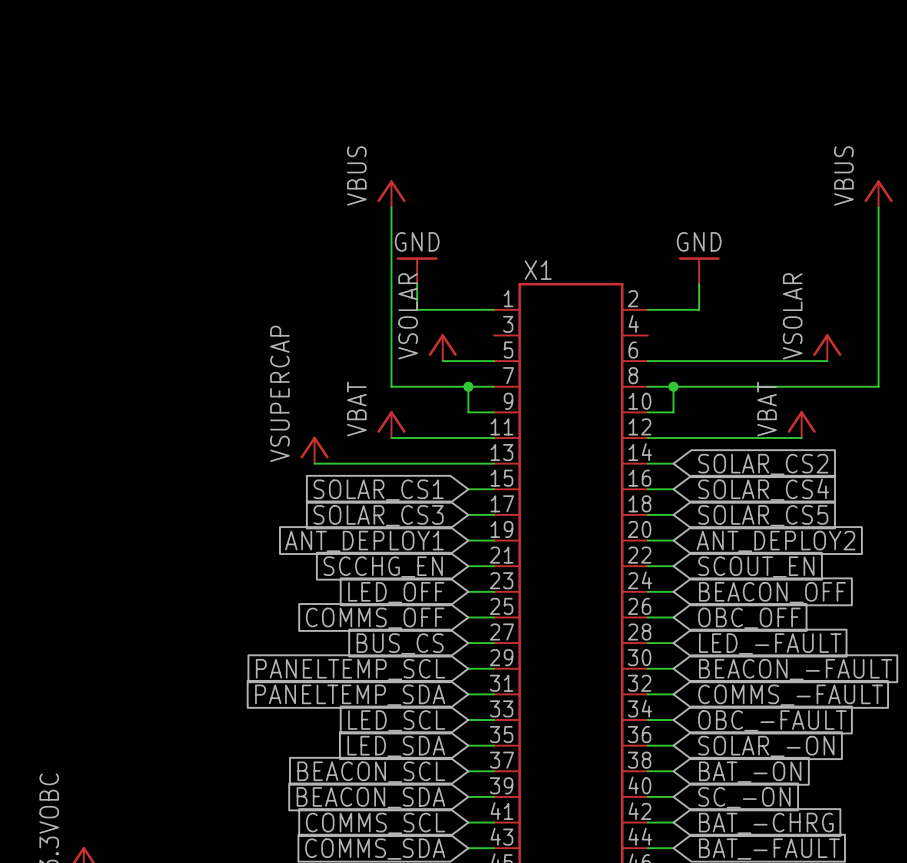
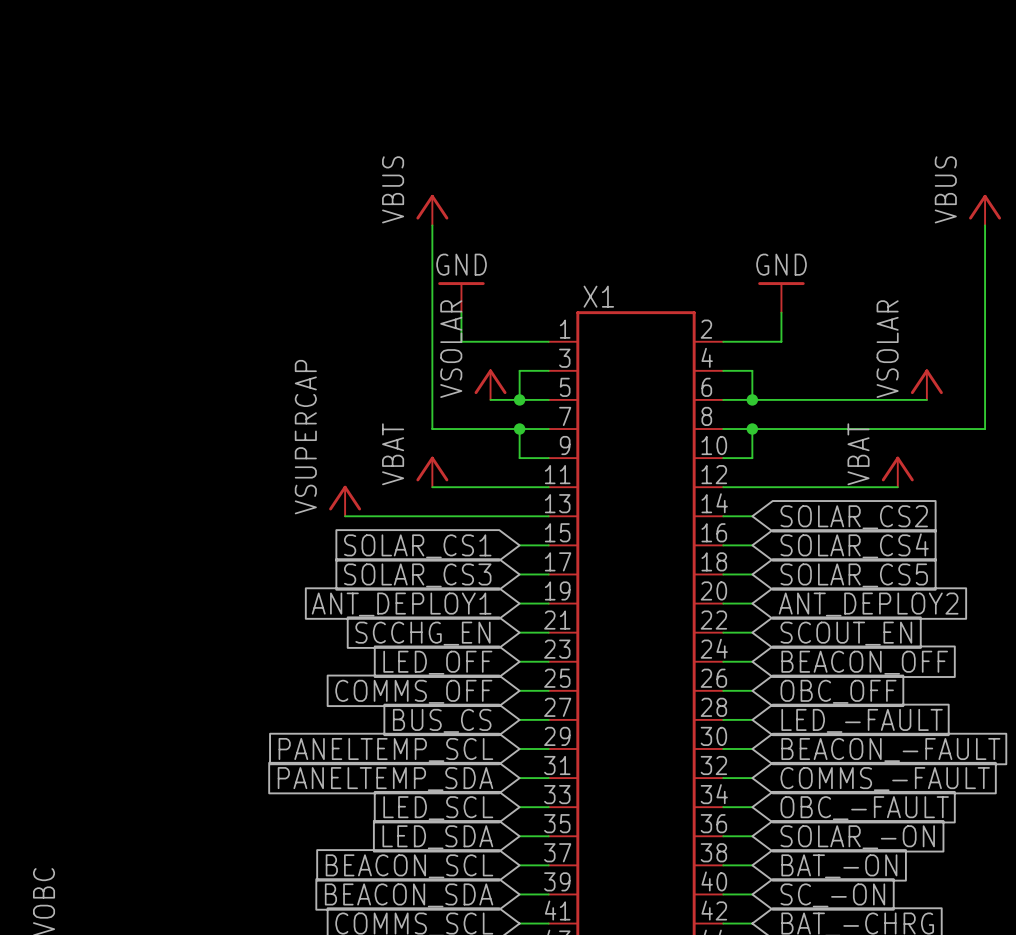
wire: none -> (548, 370) (519, 370) (519, 399)
wire: none -> (723, 370) (752, 370) (752, 399)
junction: none -> (519, 399)
junction: none -> (752, 399)

